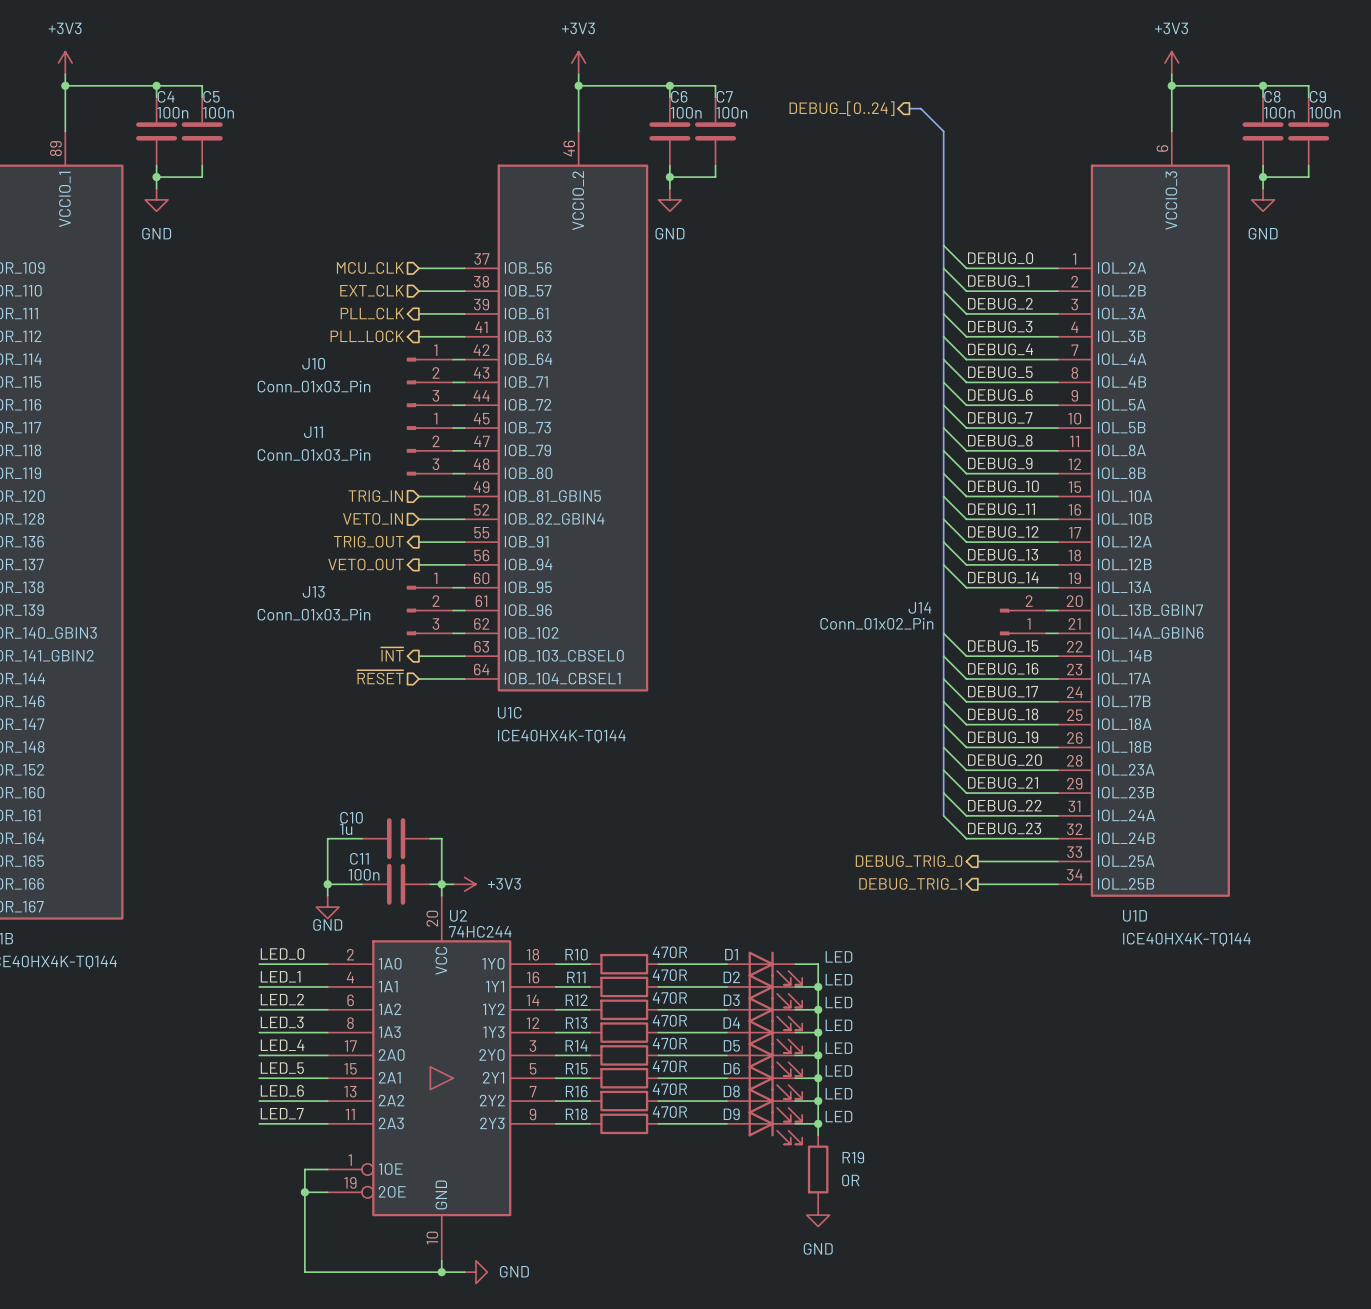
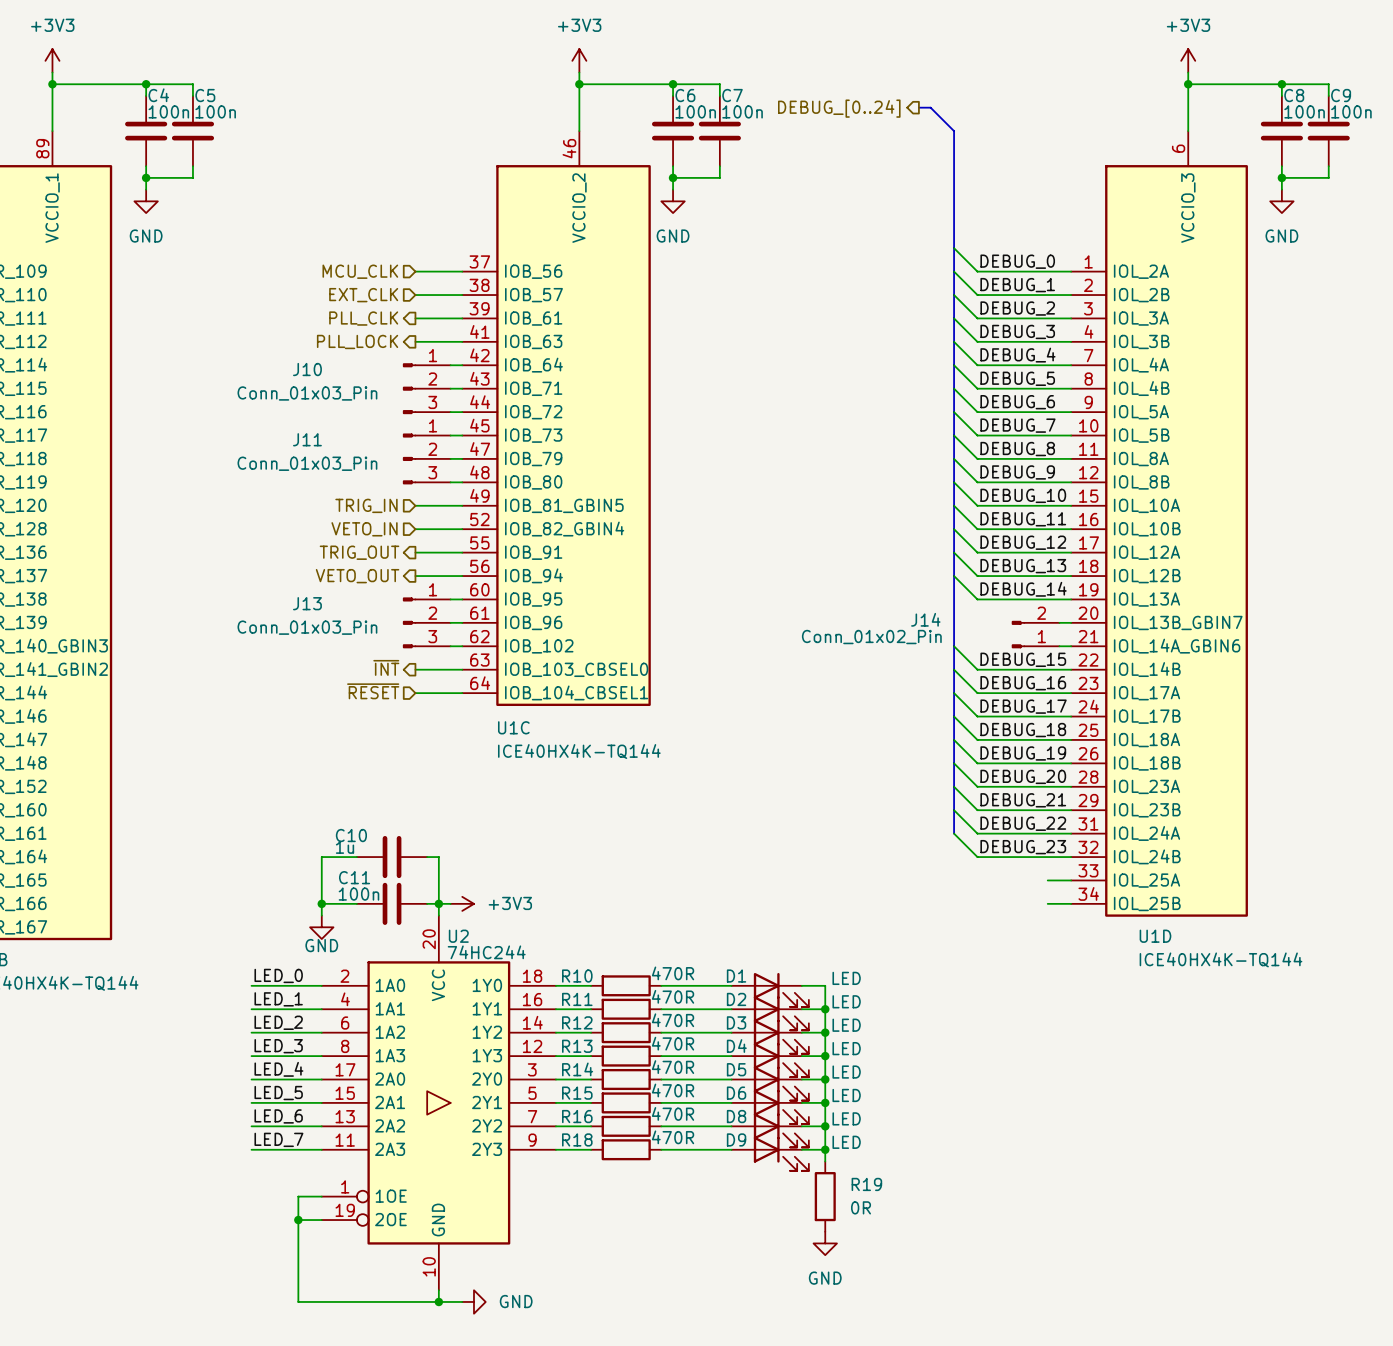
hierarchical label: DEBUG_TRIG_0 (909, 861) -> none
wire: (977, 861) (1034, 861) -> none
hierarchical label: DEBUG_TRIG_1 (910, 883) -> none
wire: (977, 884) (1034, 884) -> none

